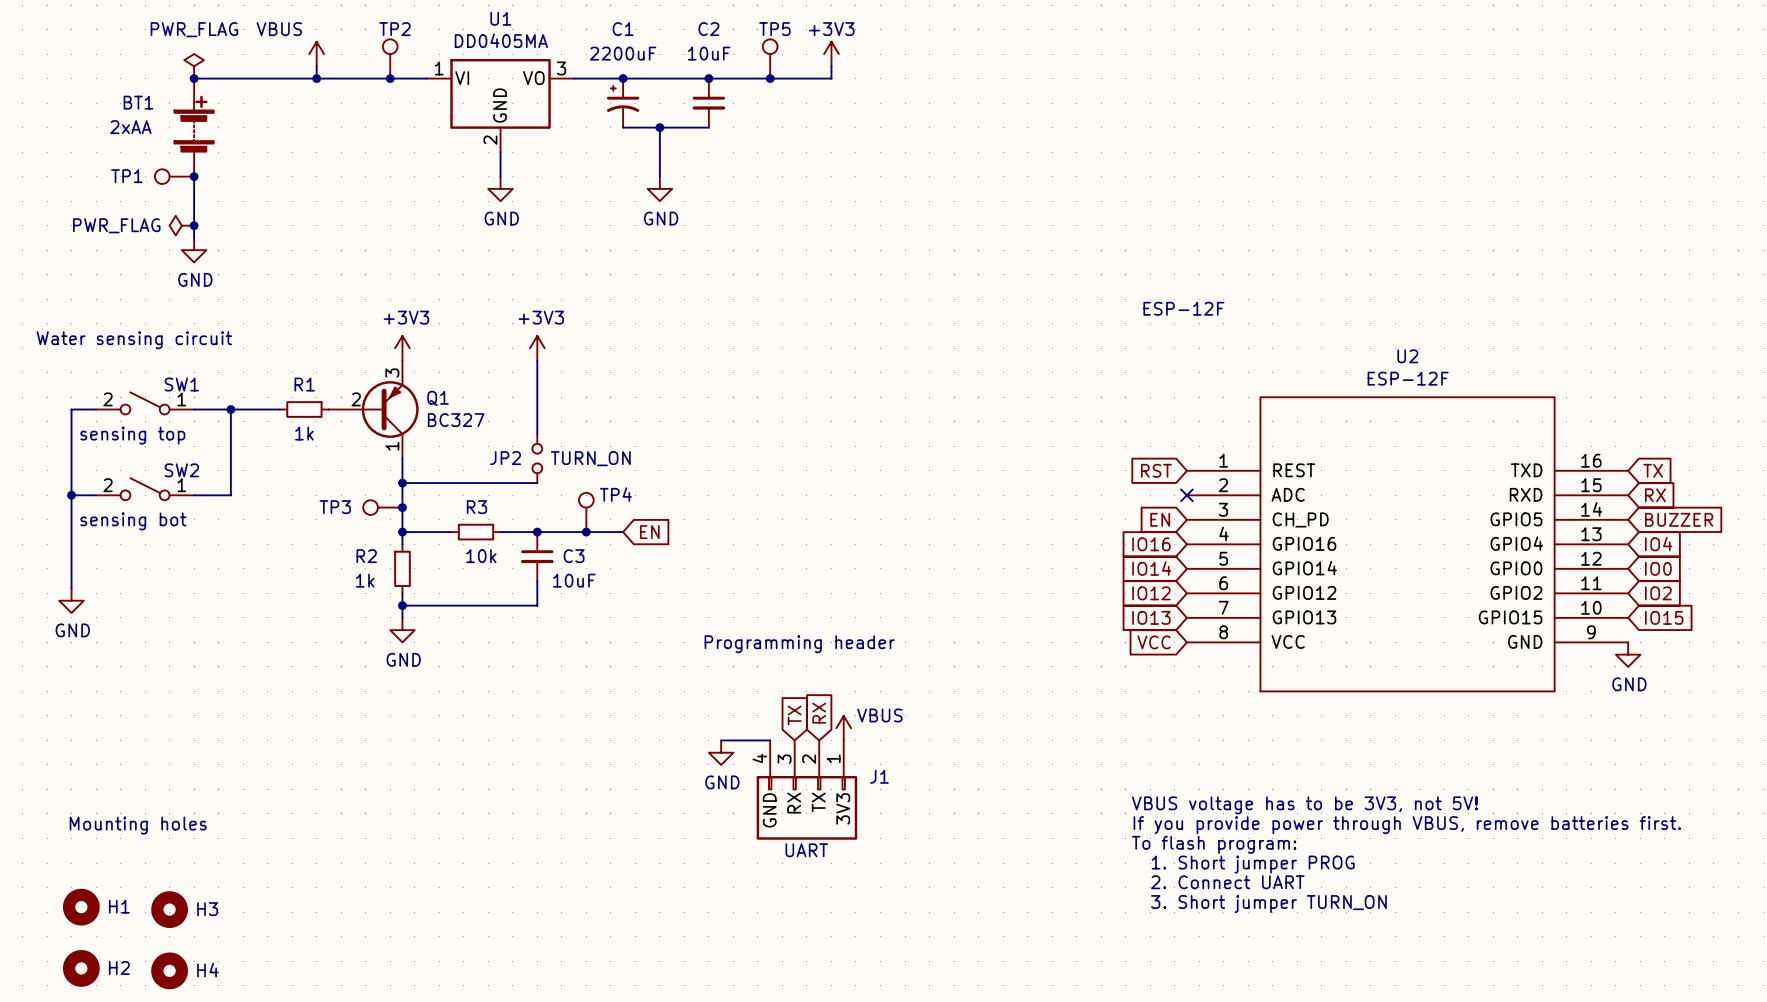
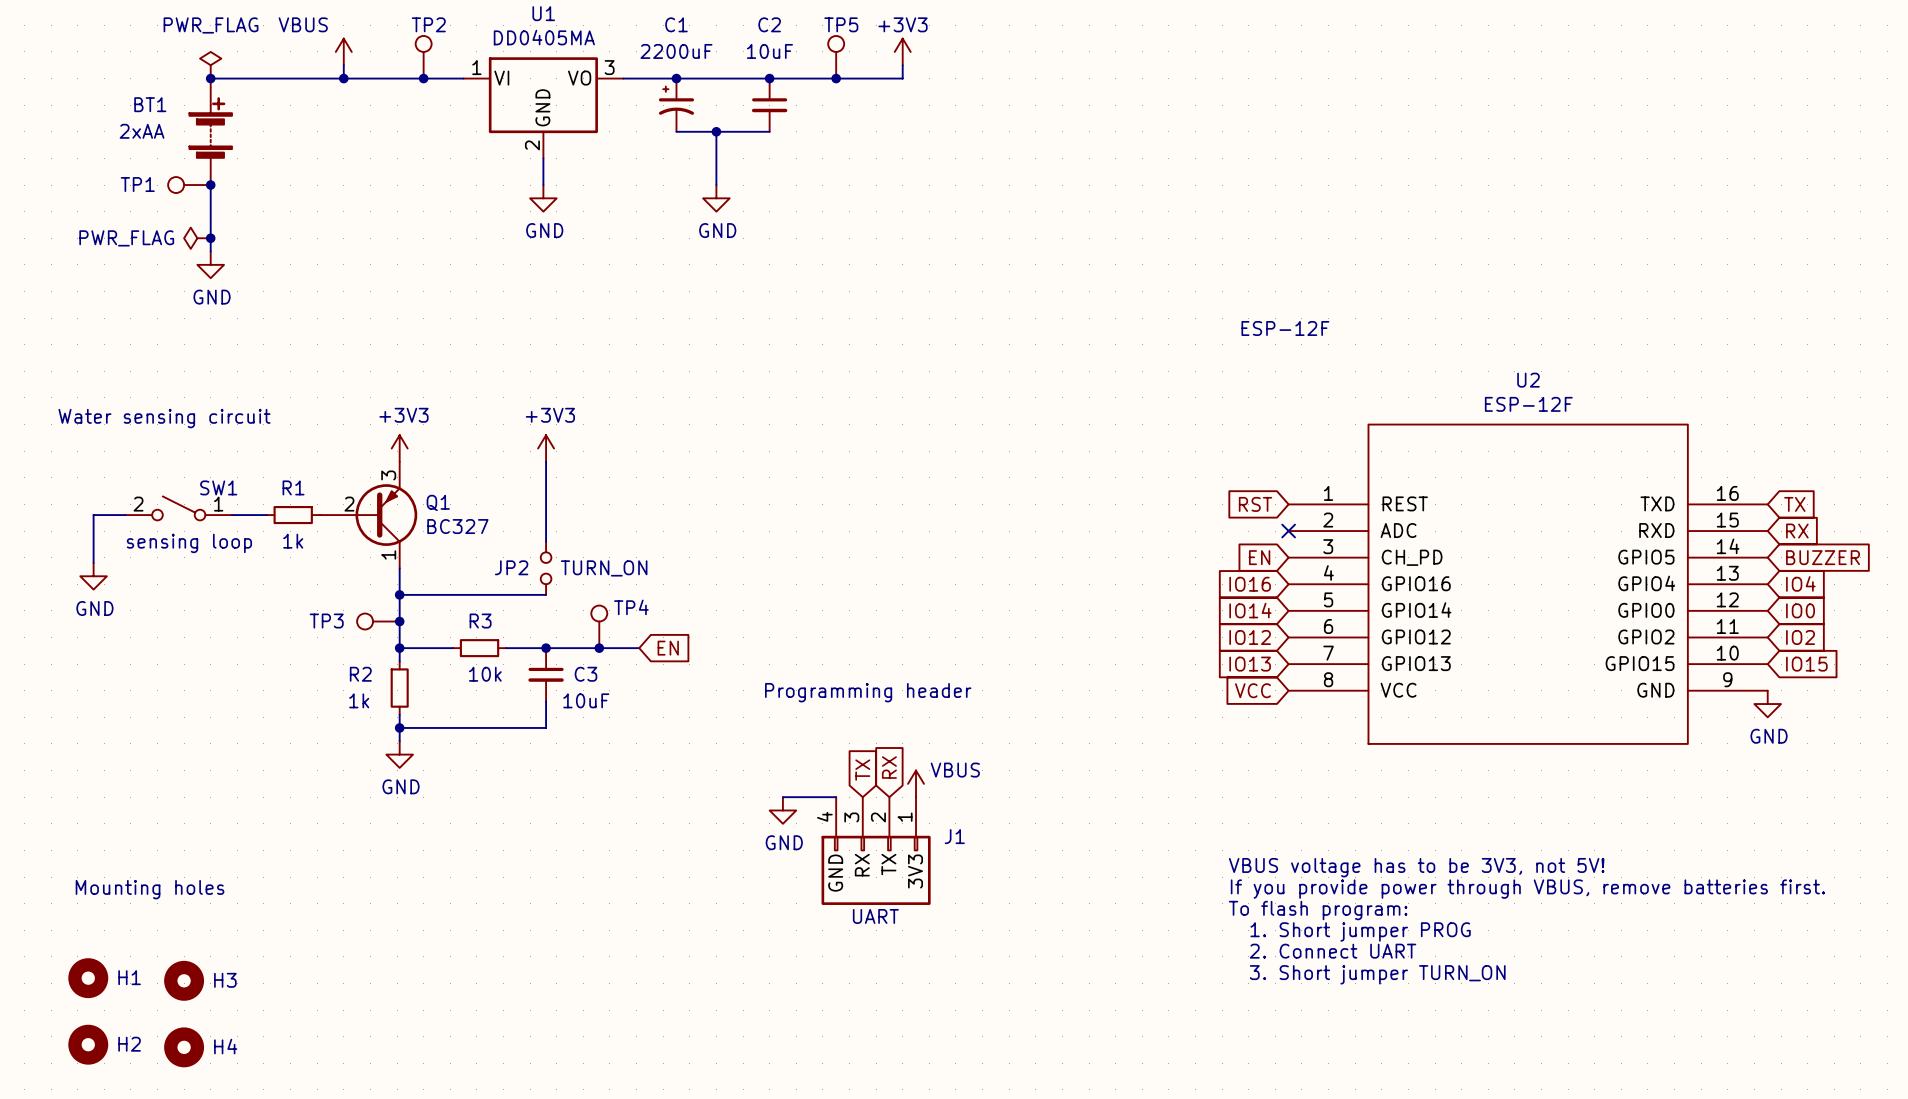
text position: Water sensing circuit (134, 340) -> Water sensing circuit (164, 418)
power symbol: +3V3 (402, 348) -> none
power symbol: +3V3 (537, 348) -> none
wire: (537, 360) (537, 434) -> (546, 461) (546, 541)
SW1 position: (145, 403) -> (178, 508)
wire: (96, 409) (71, 409) (71, 588) -> none
wire: (194, 409) (279, 409) -> none
wire: (230, 409) (230, 495) (194, 495) -> none
junction: (230, 409) -> none
R1 position: (304, 409) -> (293, 515)
Q1 position: (373, 409) -> (368, 515)
power symbol: none -> +3V3 (399, 448)
power symbol: none -> +3V3 (546, 448)
SW1 value: sensing top (132, 435) -> sensing loop (189, 543)
wire: (402, 458) (402, 544) -> (399, 568) (399, 661)
JP2 position: (537, 458) -> (546, 568)
wire: none -> (125, 515) (93, 515) (93, 562)
wire: none -> (232, 515) (266, 515)
wire: (402, 483) (537, 483) -> (399, 594) (546, 594)
junction: (402, 483) -> none
SW2: sensing bot (145, 489) -> none
wire: (71, 495) (96, 495) -> none
junction: (71, 495) -> none
TP3 position: (382, 507) -> (378, 621)
junction: (402, 507) -> none
TP4 position: (586, 512) -> (599, 626)
wire: (402, 532) (451, 532) -> (399, 648) (452, 648)
junction: (402, 532) -> none
R3 position: (476, 532) -> (479, 648)
wire: (500, 532) (623, 532) -> (506, 648) (639, 648)
junction: (537, 532) -> none
junction: (586, 532) -> none
global label position: EN (649, 532) -> EN (668, 648)
junction: none -> (399, 594)
C3 position: (537, 556) -> (546, 674)
R2 position: (402, 568) -> (399, 688)
junction: none -> (399, 621)
wire: (537, 581) (537, 605) (402, 605) -> (546, 701) (546, 727) (399, 727)
wire: (402, 593) (402, 617) -> (399, 714) (399, 741)
power symbol position: GND (71, 600) -> GND (93, 576)
junction: none -> (399, 648)
junction: none -> (546, 648)
junction: none -> (599, 648)
junction: (402, 605) -> none
power symbol position: GND (402, 630) -> GND (399, 754)
junction: none -> (399, 727)

